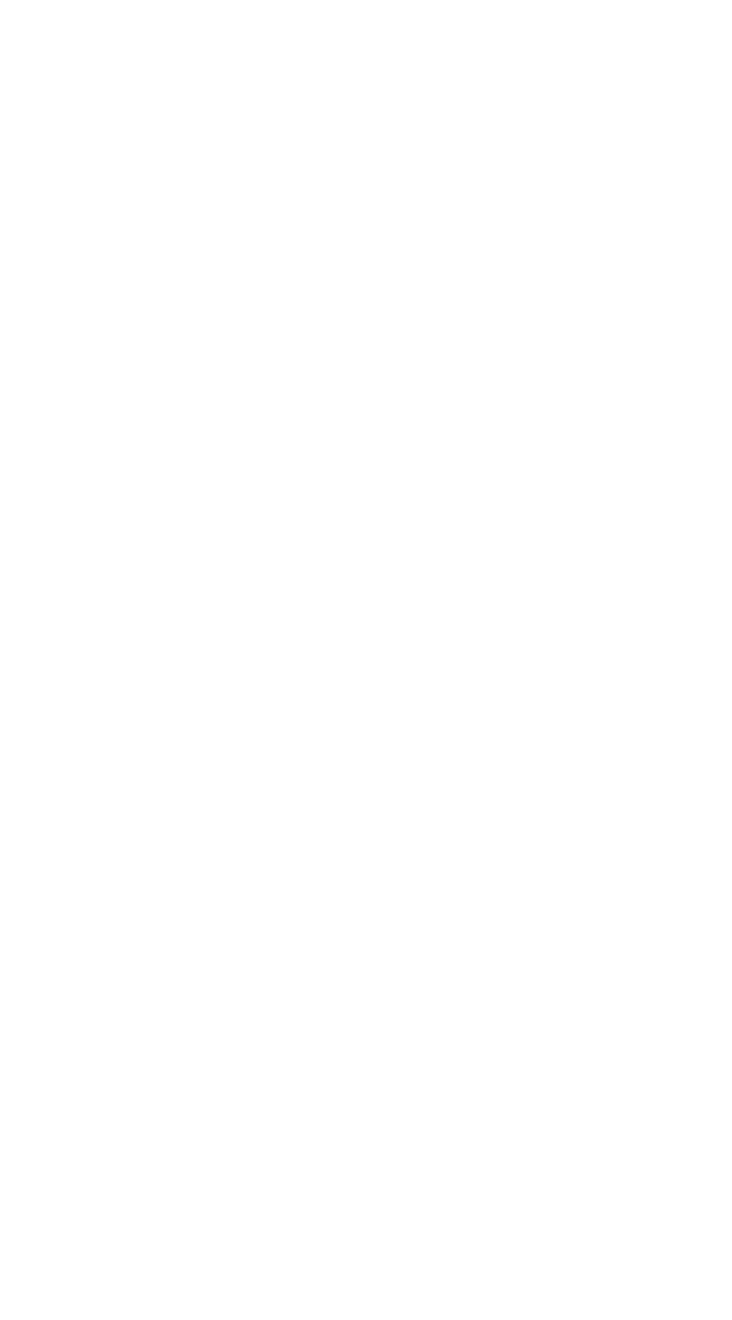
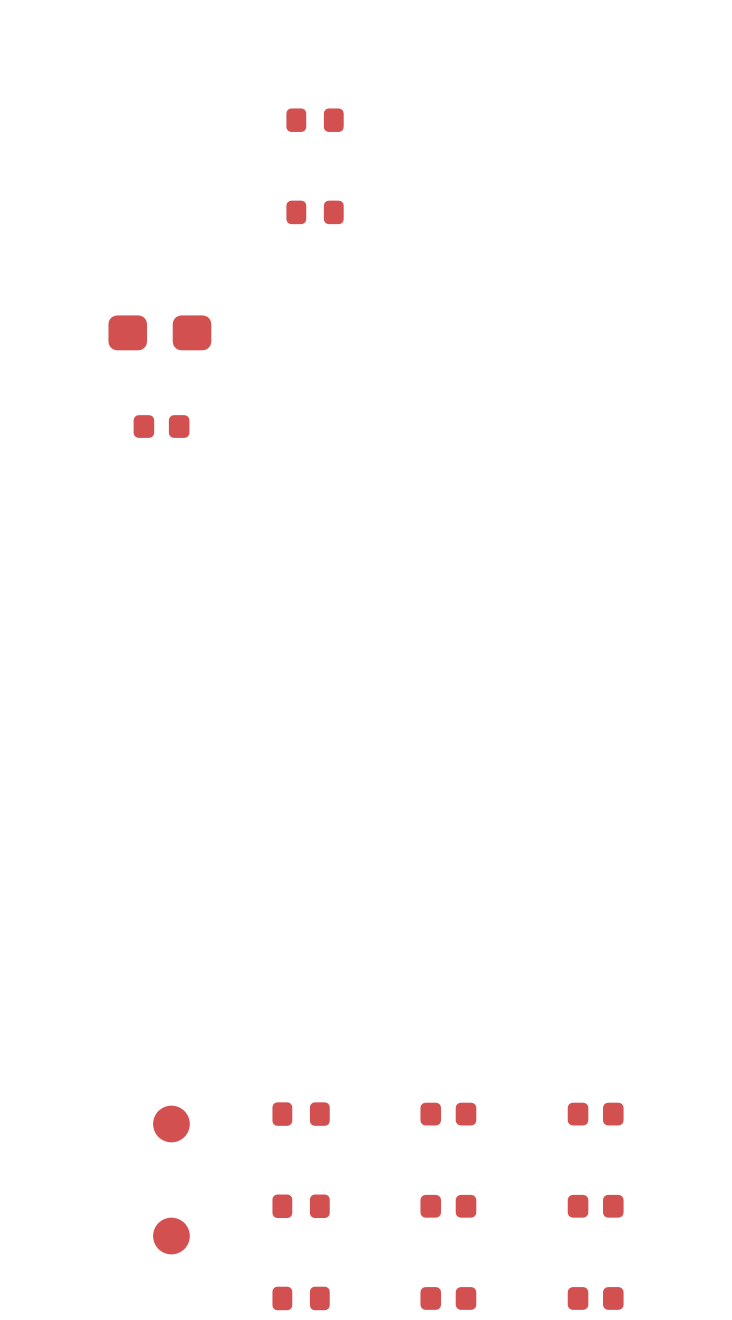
part: none -> (315, 120)
part: none -> (315, 212)
part: none -> (159, 332)
part: none -> (161, 426)
part: none -> (301, 1114)
part: none -> (448, 1114)
part: none -> (595, 1114)
part: none -> (171, 1124)
part: none -> (301, 1206)
part: none -> (448, 1206)
part: none -> (595, 1206)
part: none -> (171, 1236)
part: none -> (301, 1298)
part: none -> (448, 1298)
part: none -> (595, 1298)

